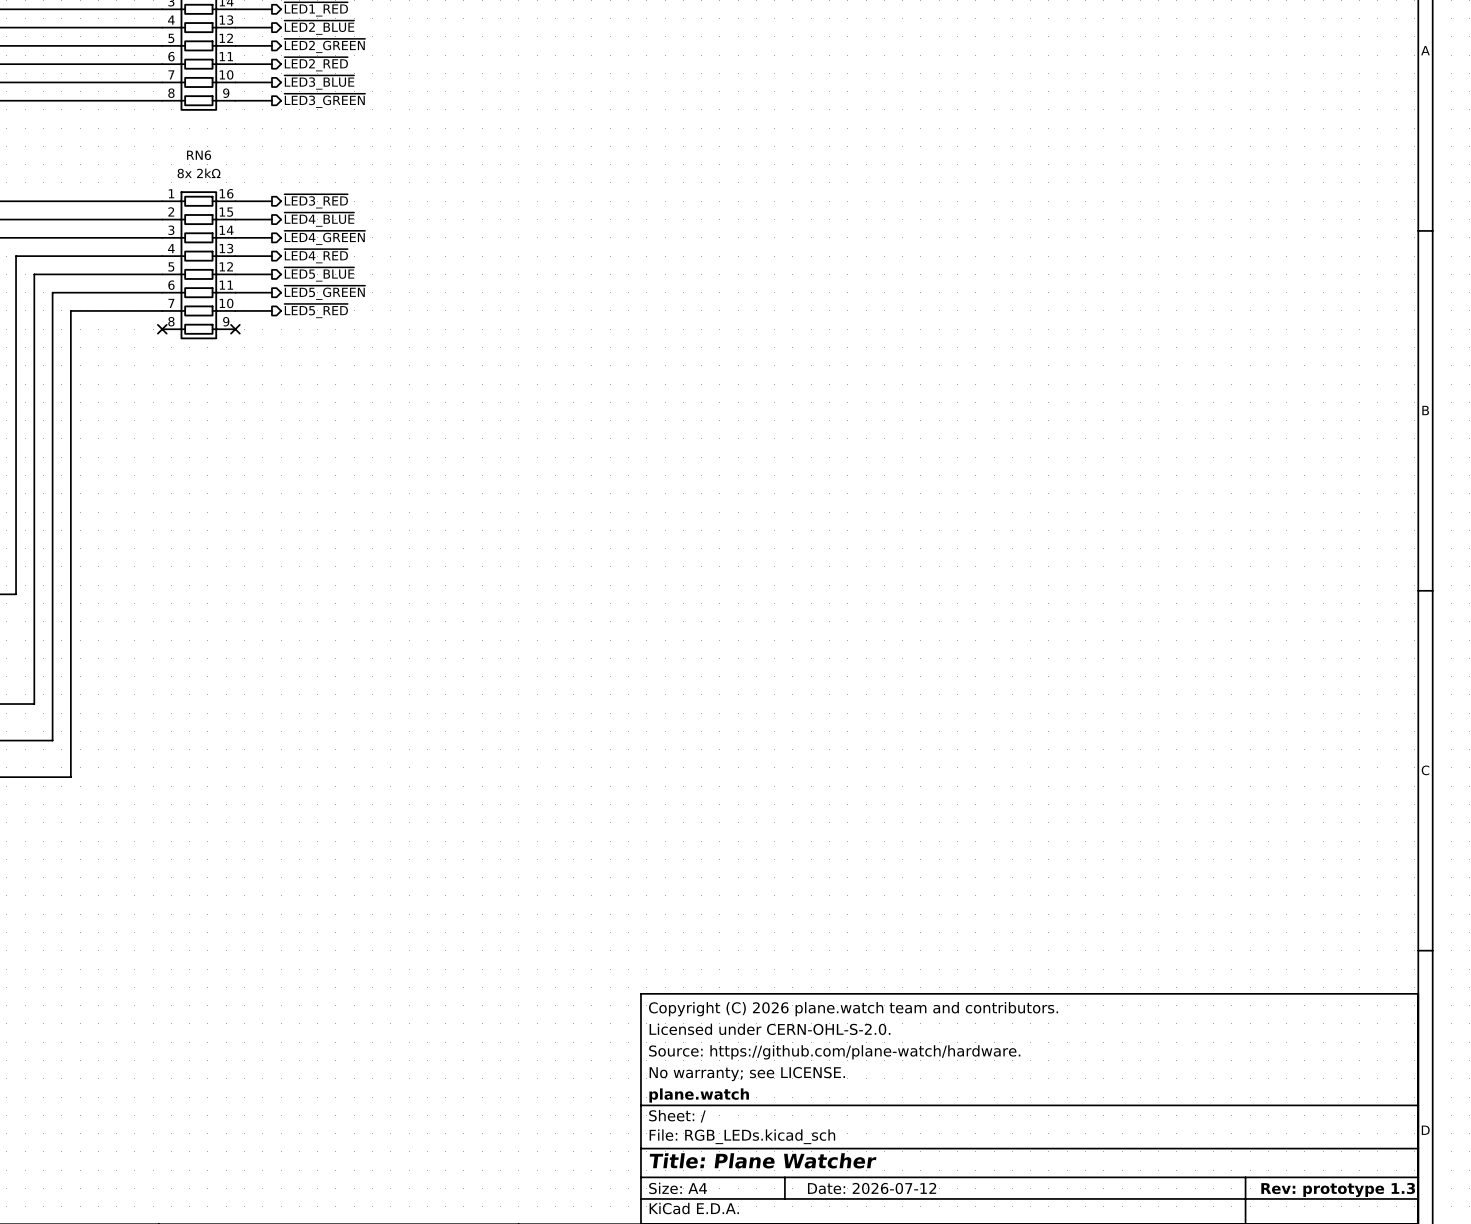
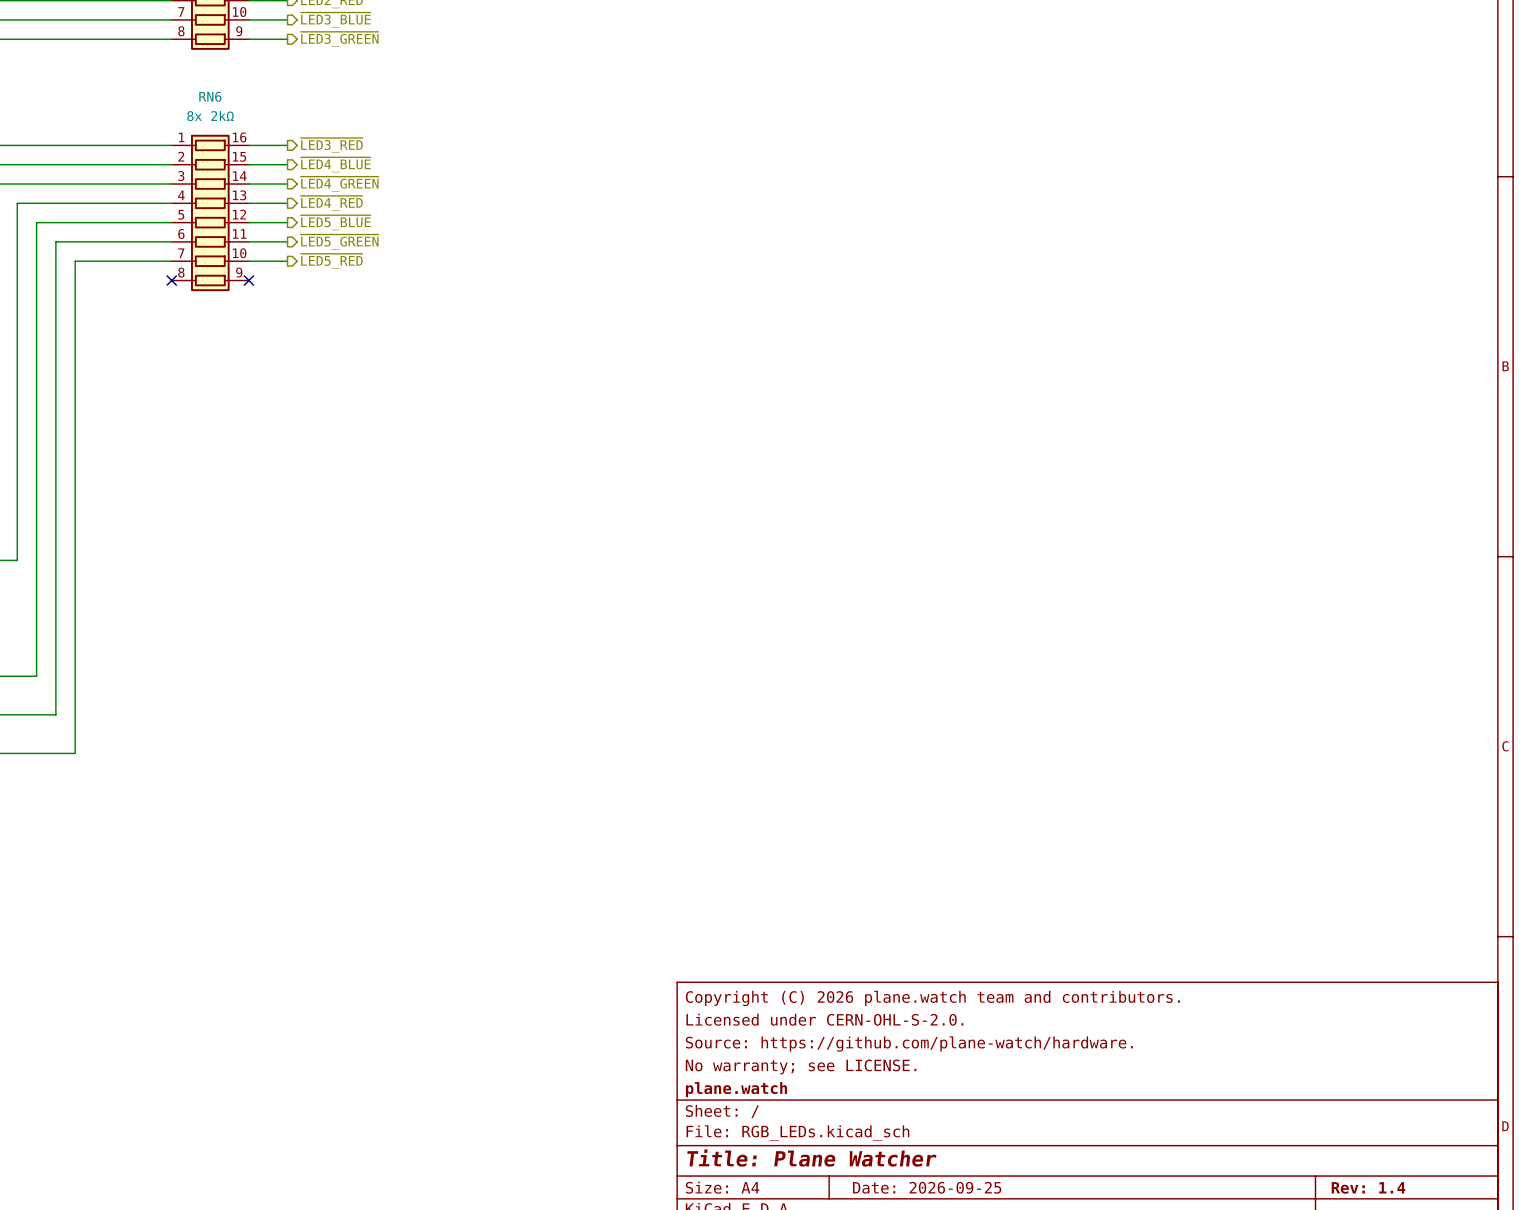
title block: Date: 2026-07-12 (872, 1188) -> Date: 2026-09-25 (927, 1187)
title block: Rev: prototype 1.3 (1338, 1189) -> Rev: 1.4 (1368, 1187)

